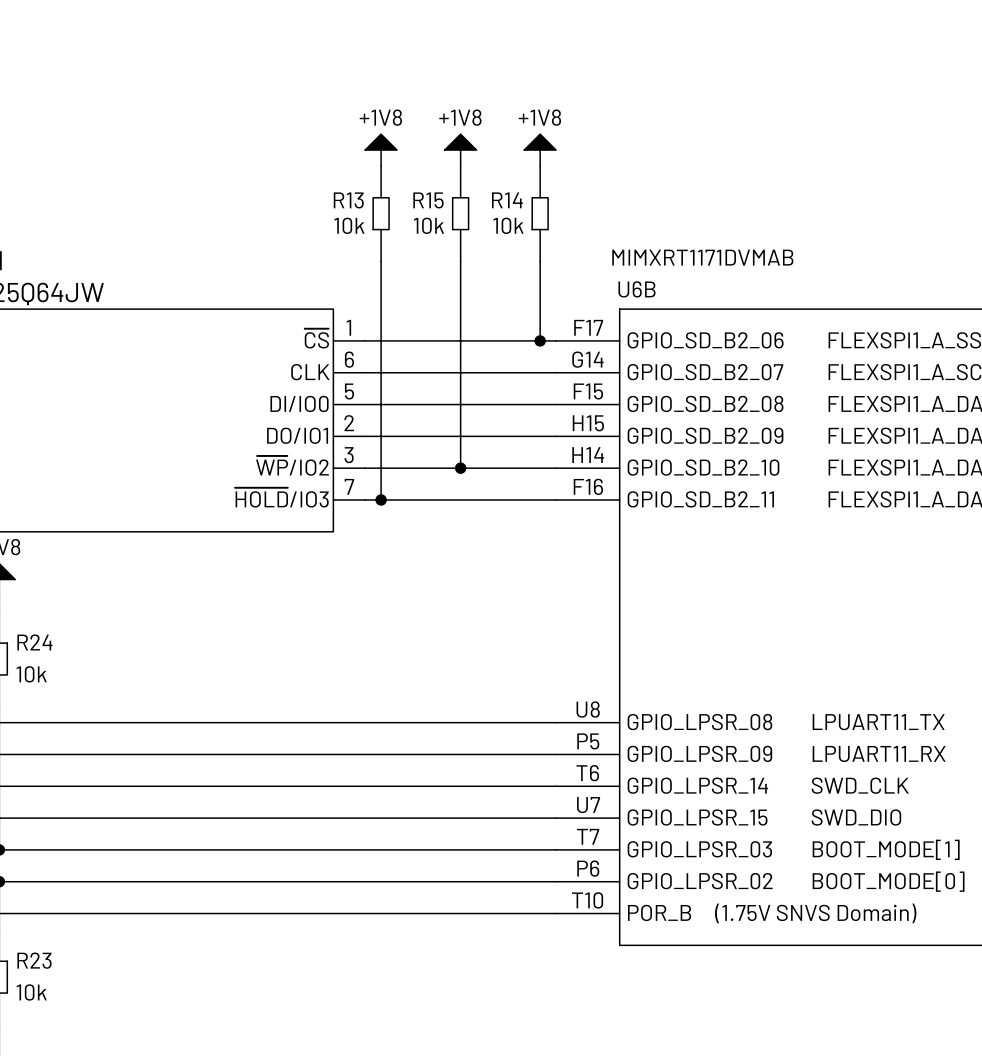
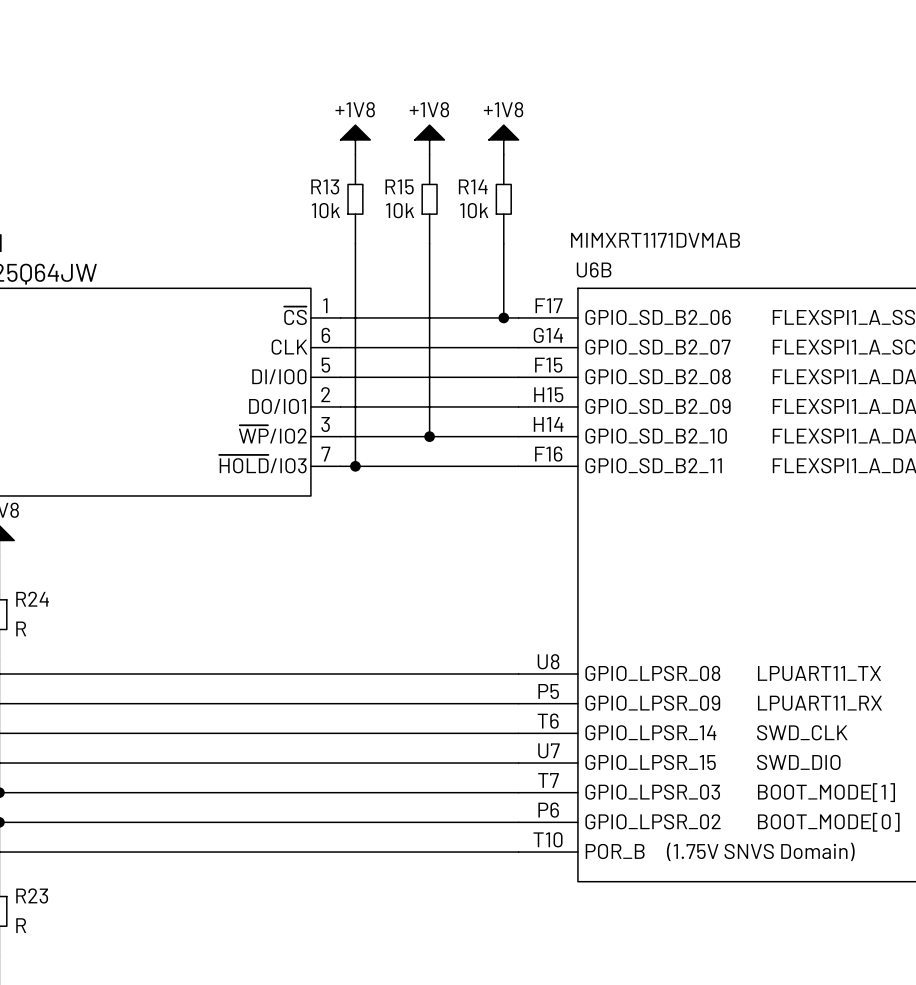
R24 value: 10k (31, 674) -> R (21, 628)
R23 value: 10k (31, 992) -> R (21, 925)

